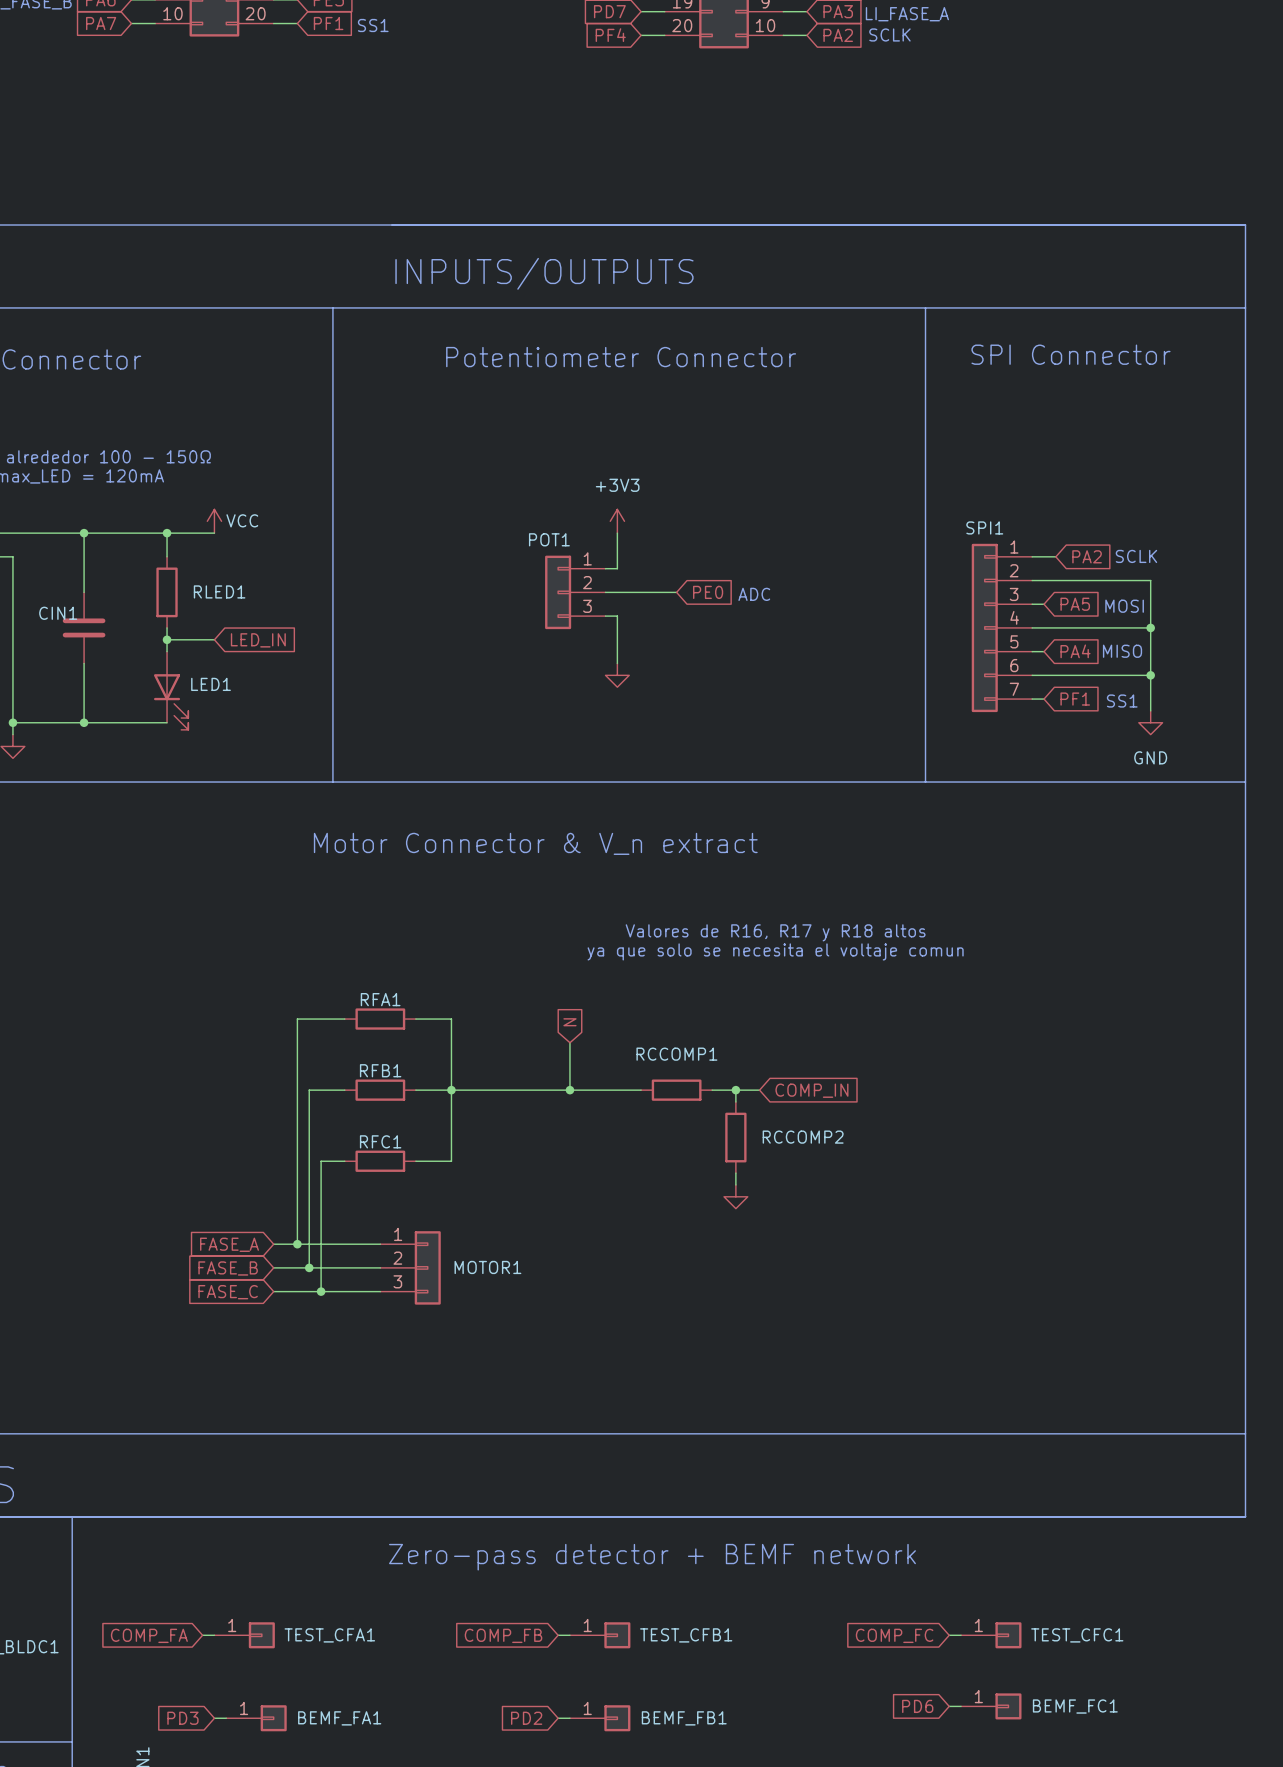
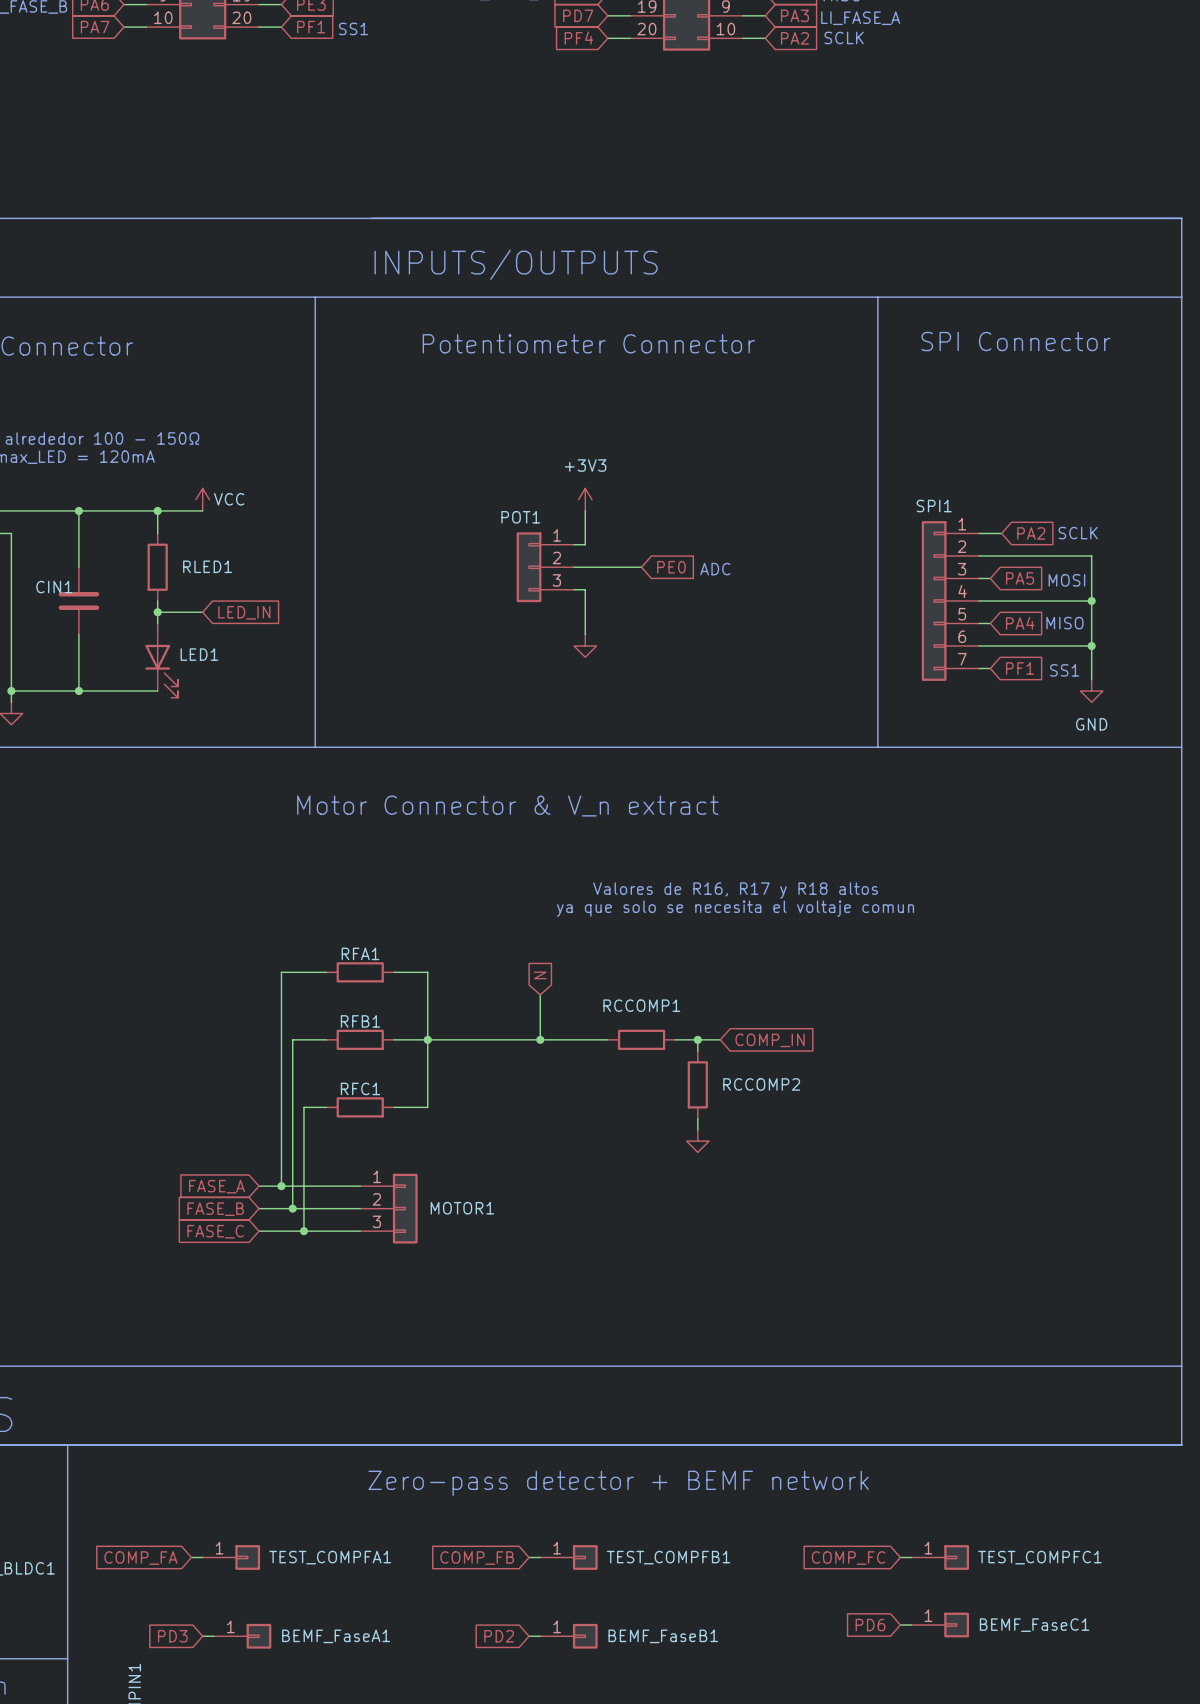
TEST_CFA1 name: TEST_CFA1 (329, 1635) -> TEST_COMPFA1 (330, 1557)
TEST_CFB1 name: TEST_CFB1 (686, 1635) -> TEST_COMPFB1 (668, 1557)
TEST_CFC1 name: TEST_CFC1 (1077, 1635) -> TEST_COMPFC1 (1039, 1557)
BEMF_FC1 name: BEMF_FC1 (1075, 1706) -> BEMF_FaseC1 (1034, 1625)
BEMF_FA1 name: BEMF_FA1 (339, 1718) -> BEMF_FaseA1 (336, 1636)
BEMF_FB1 name: BEMF_FB1 (684, 1718) -> BEMF_FaseB1 (663, 1636)

